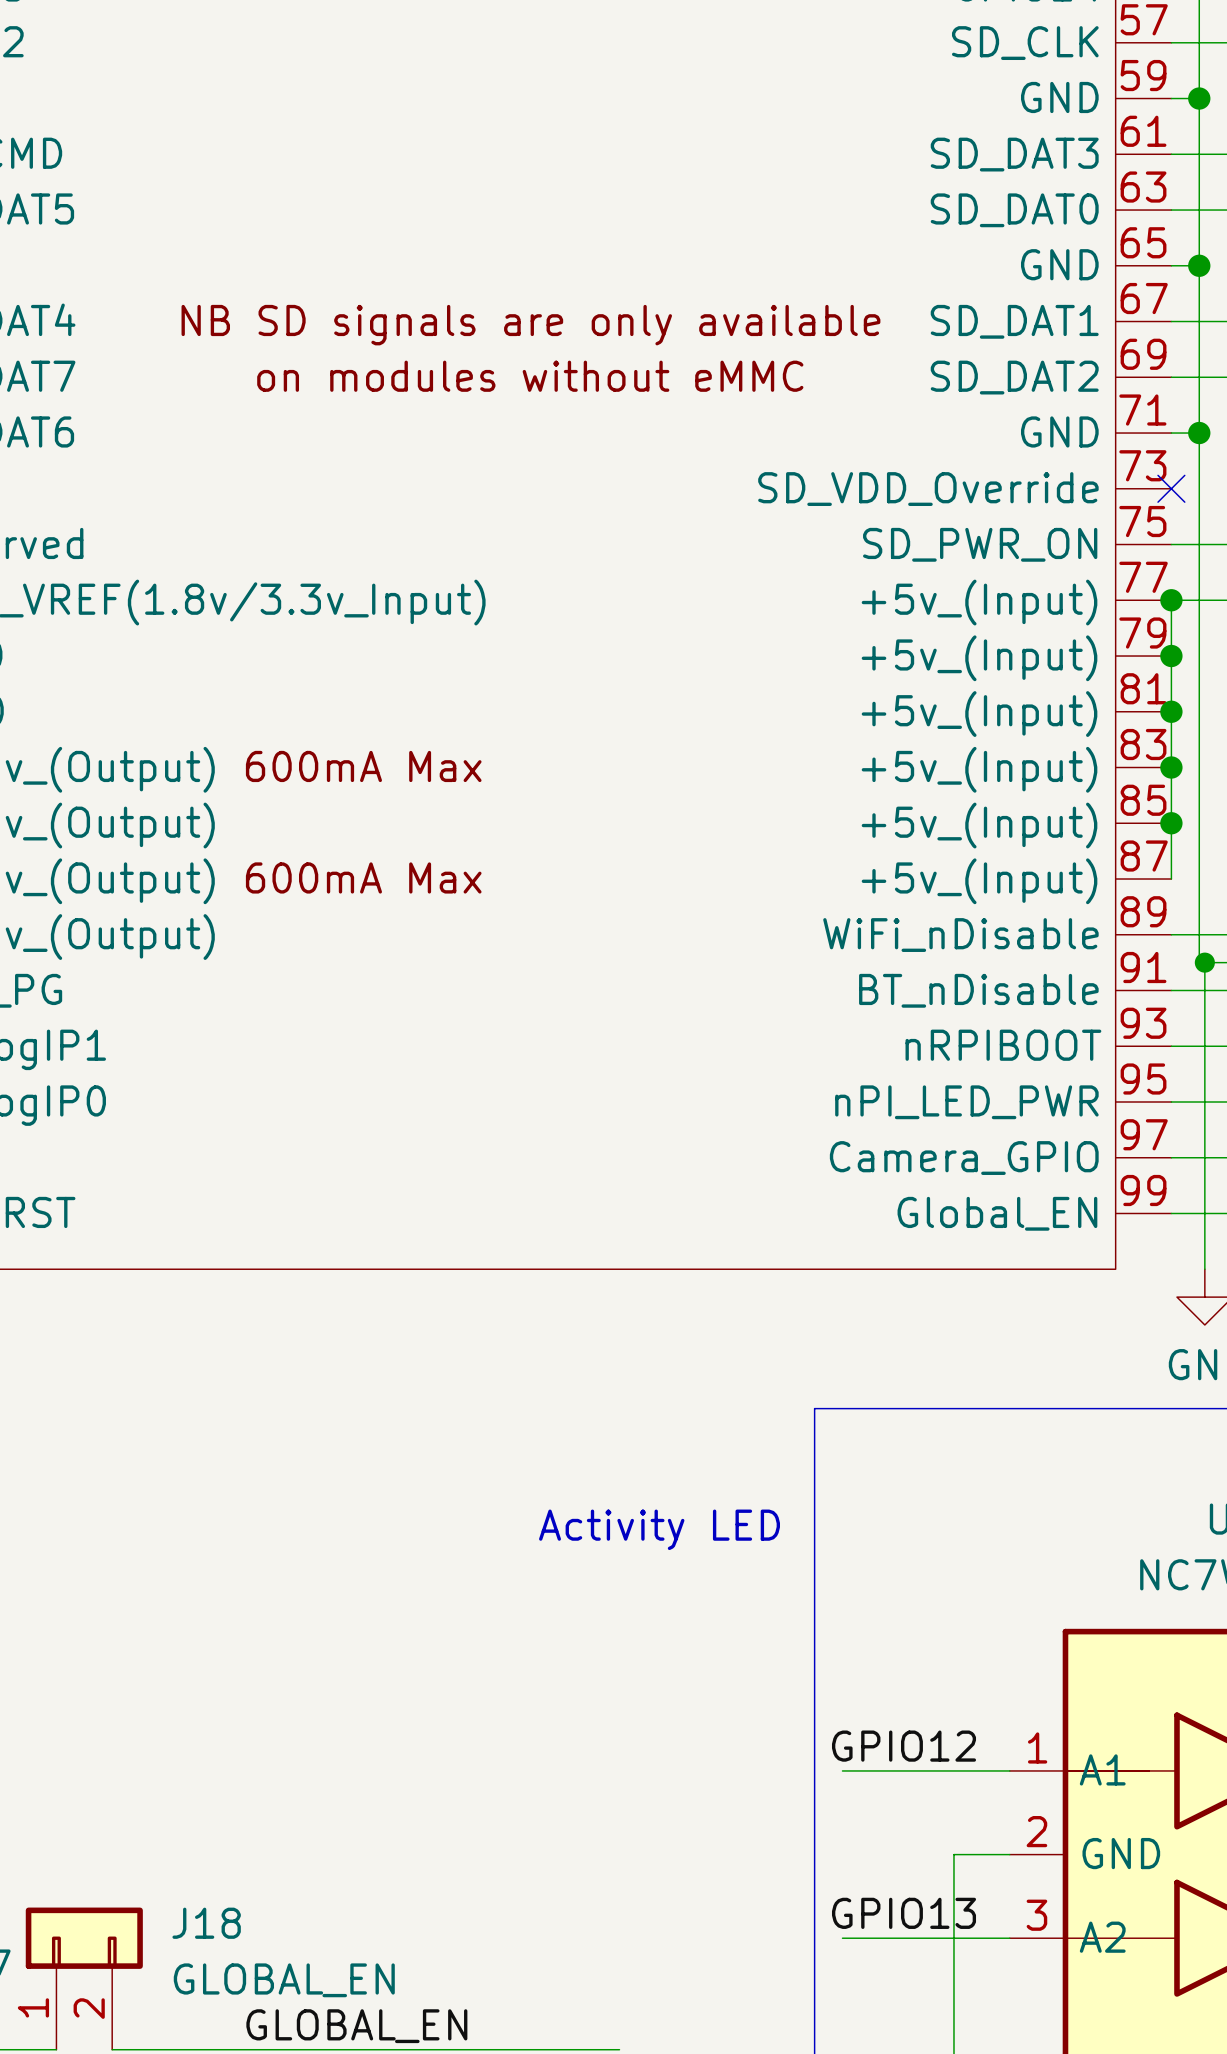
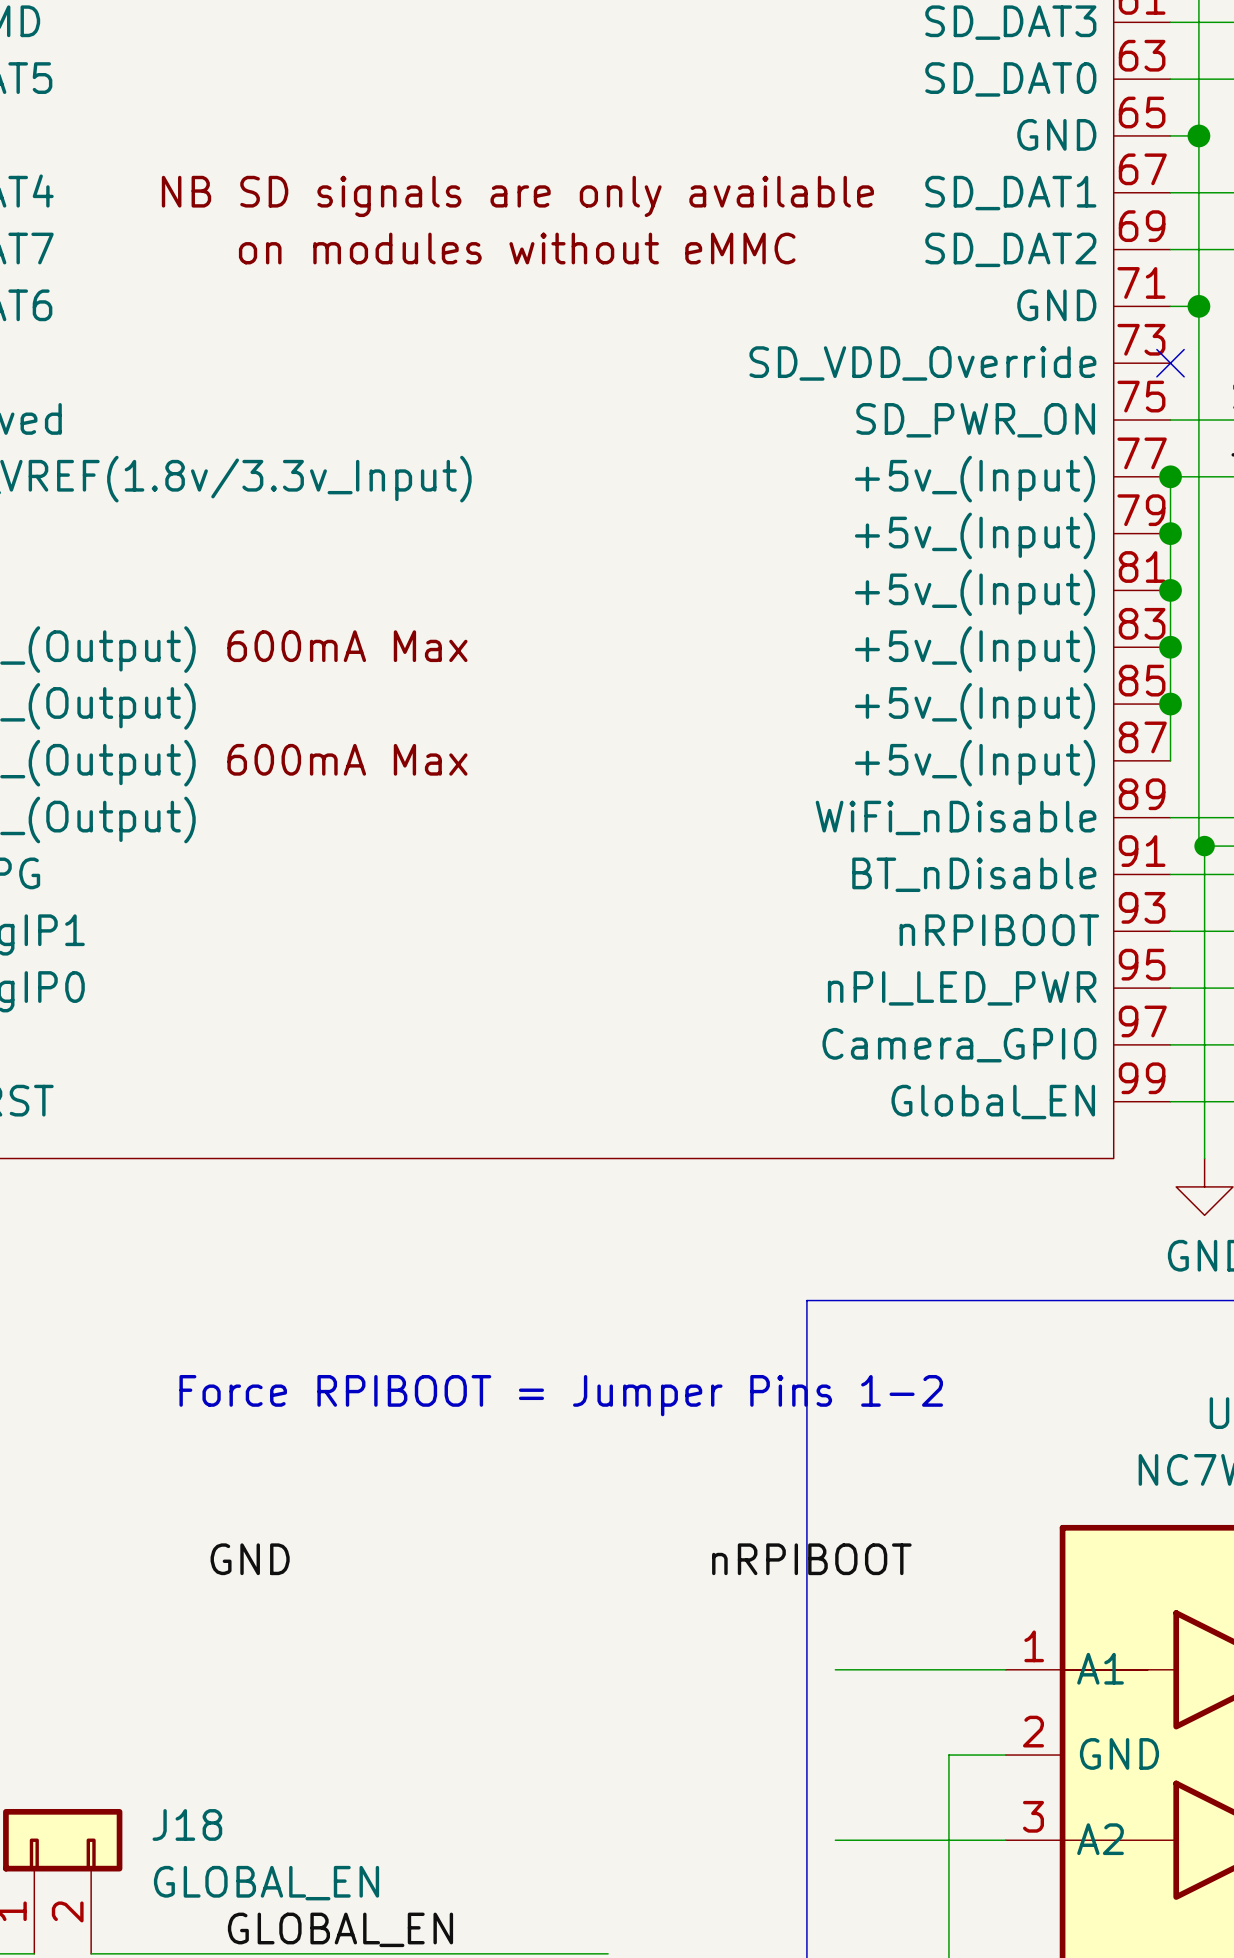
text: none -> Force RPIBOOT = Jumper Pins 1-2 (561, 1395)
text: Activity LED (659, 1529) -> none
label: none -> GND (250, 1559)
label: none -> nRPIBOOT (811, 1559)
label: GPIO12 (904, 1746) -> none
label: GPIO13 (904, 1913) -> none

